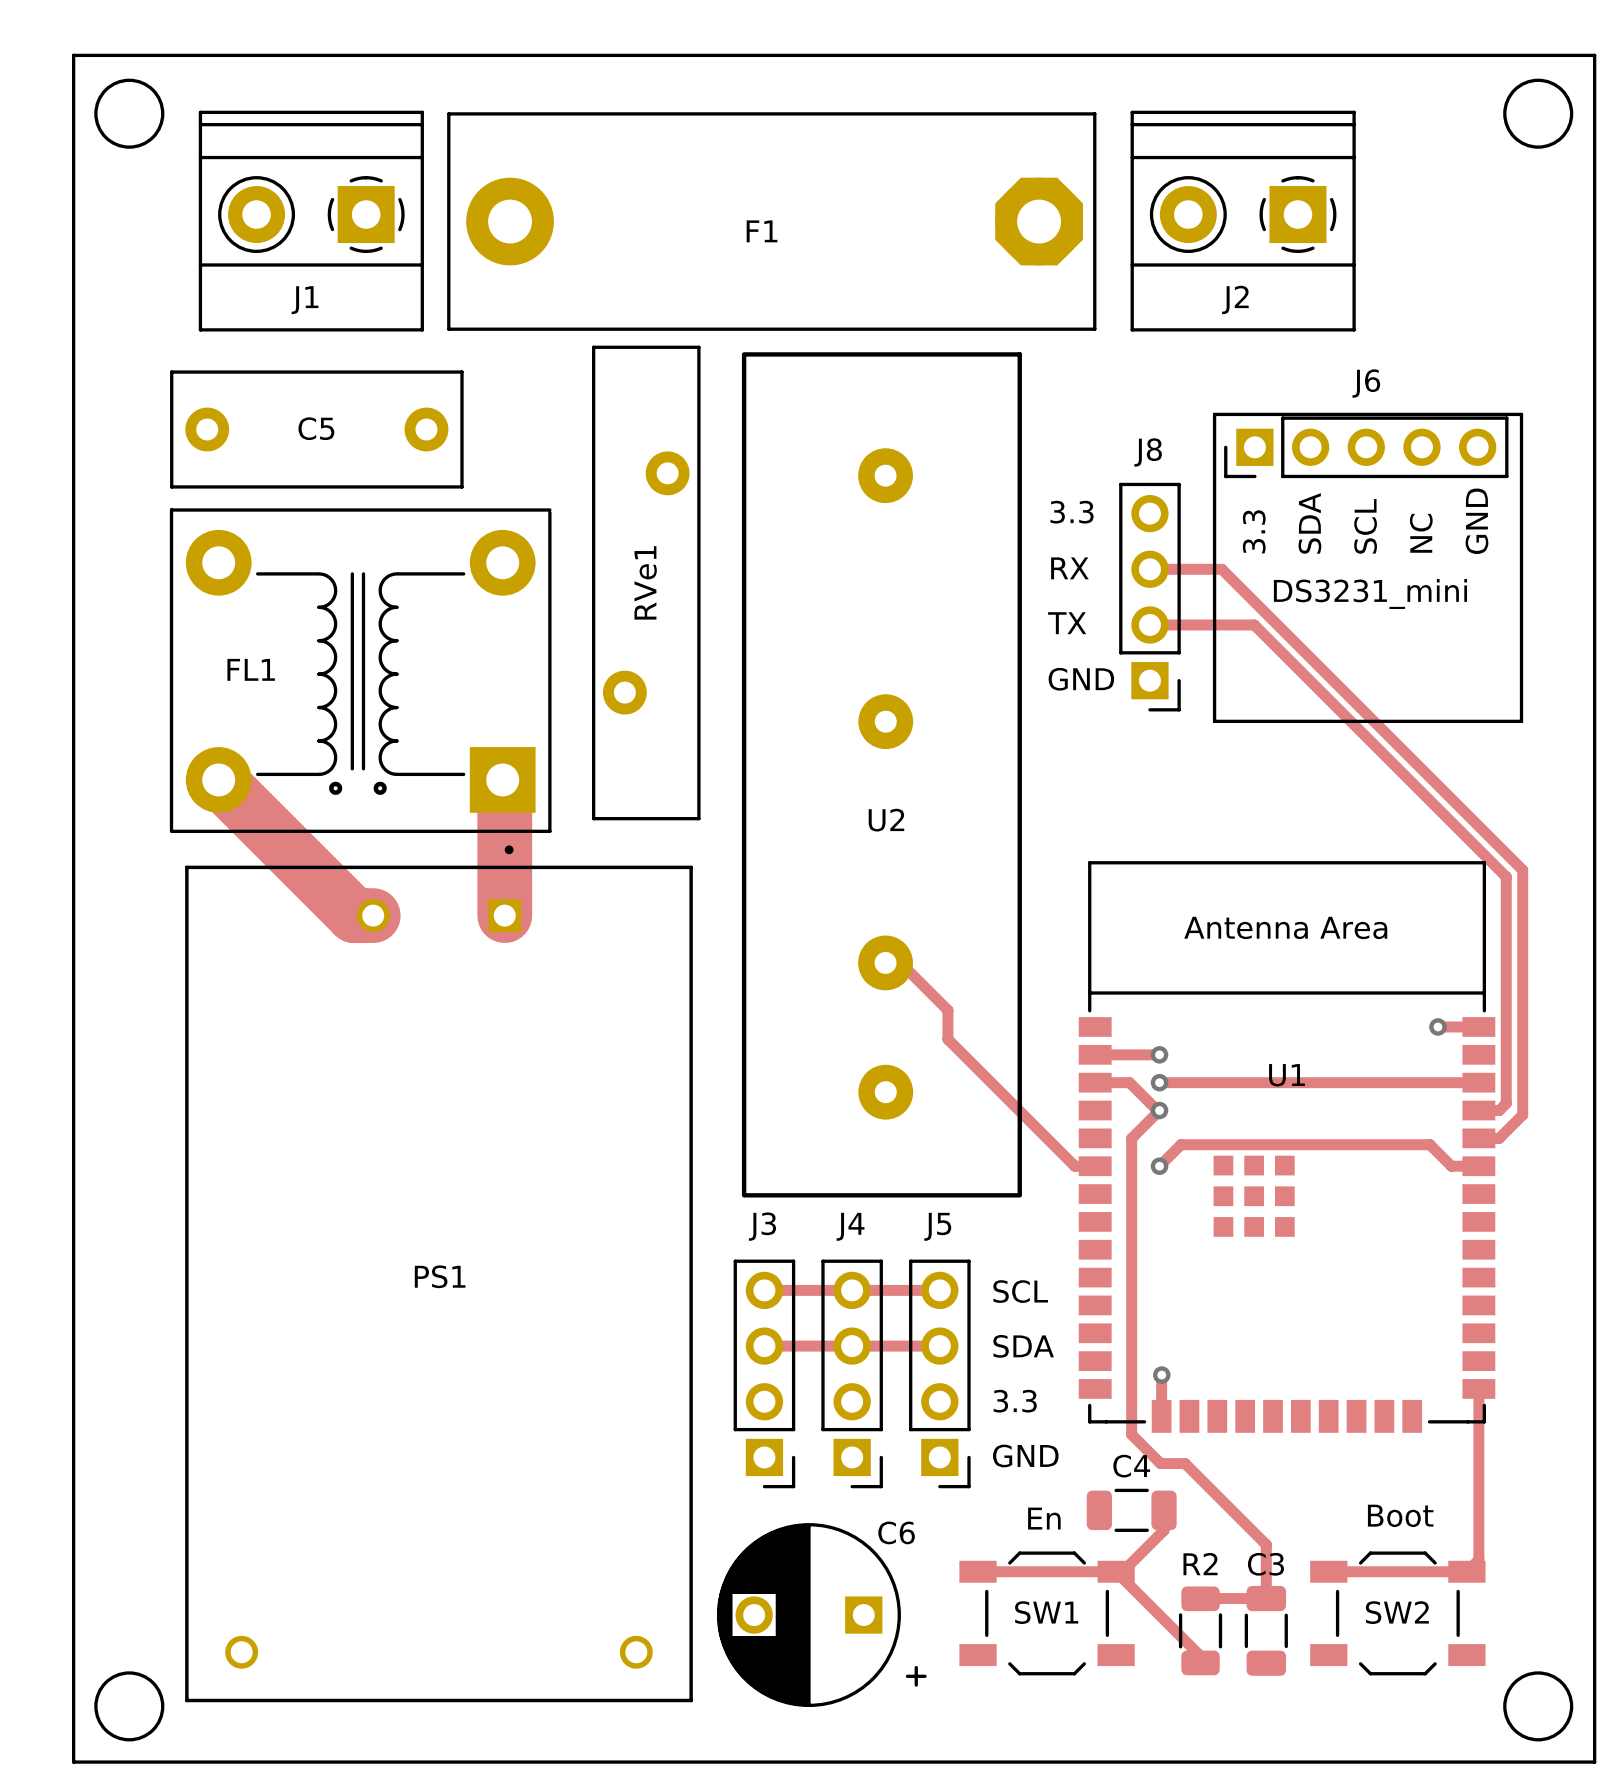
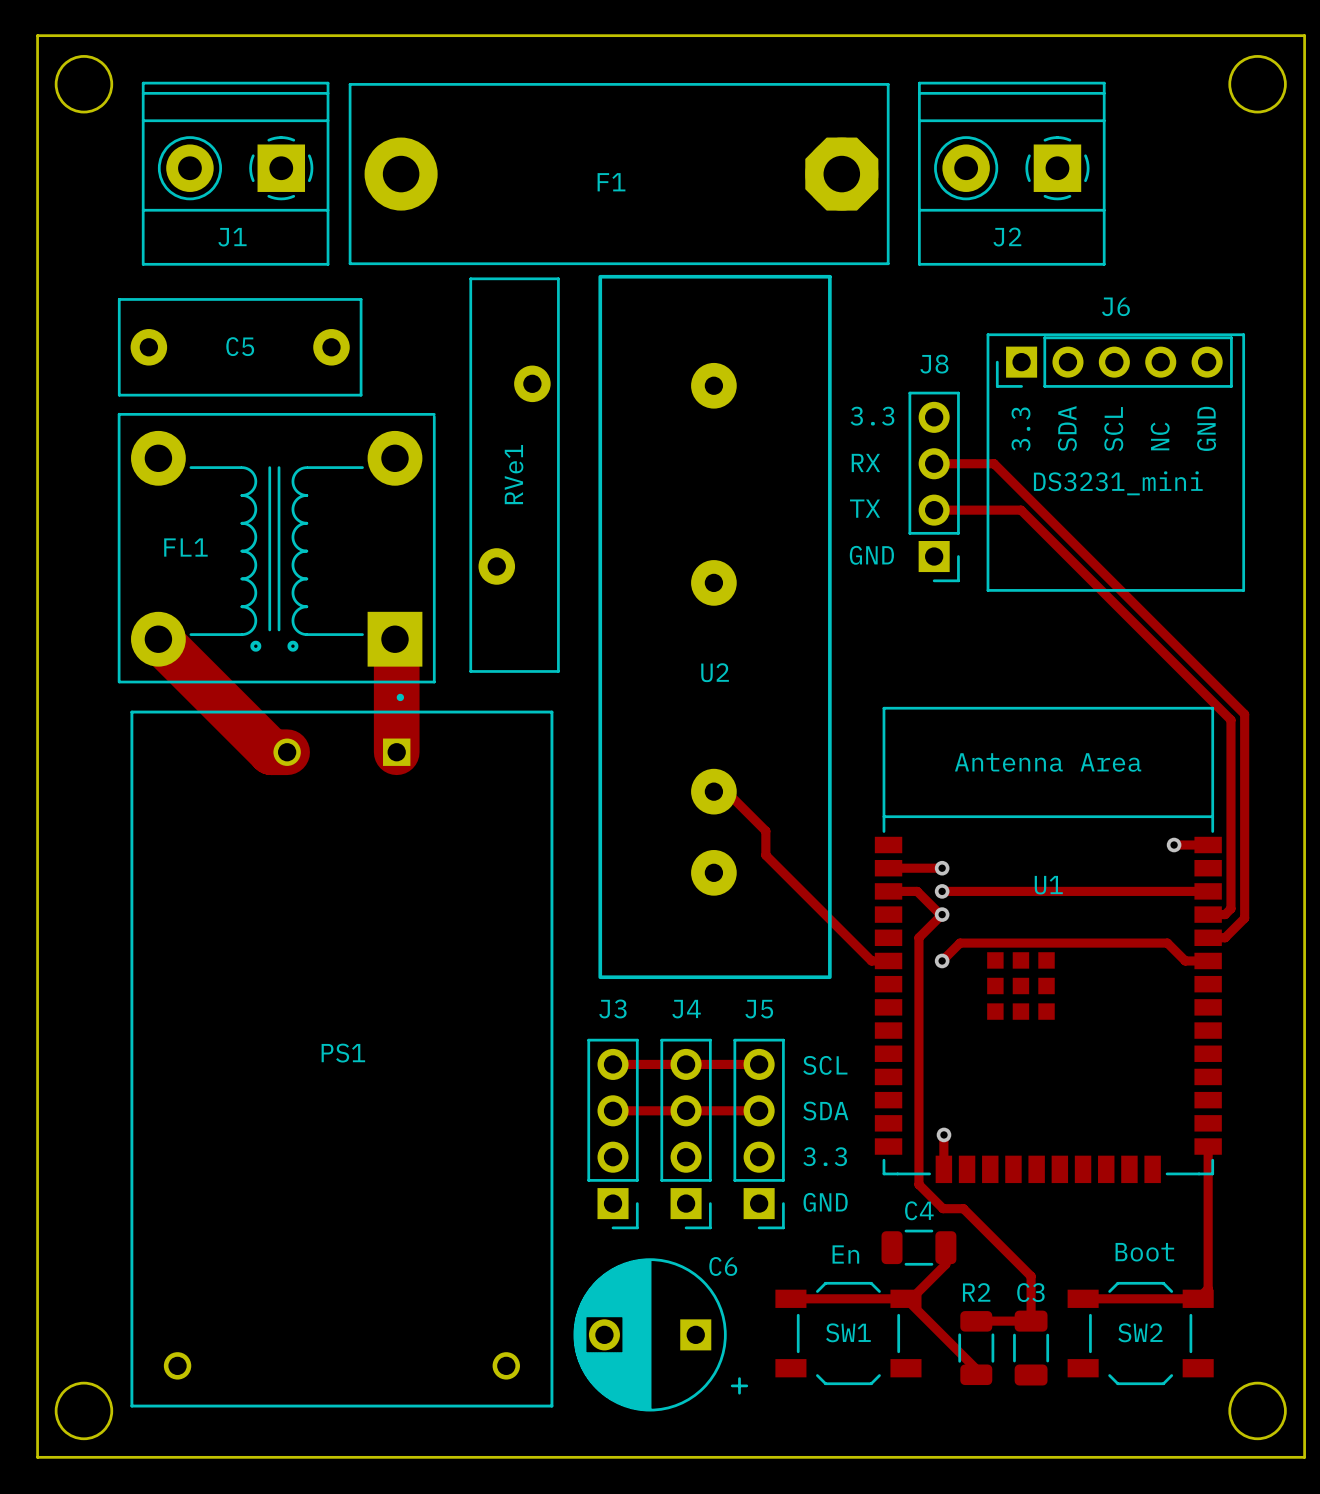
U2 footprint: [741, 352, 1022, 1198] -> [598, 274, 832, 980]

